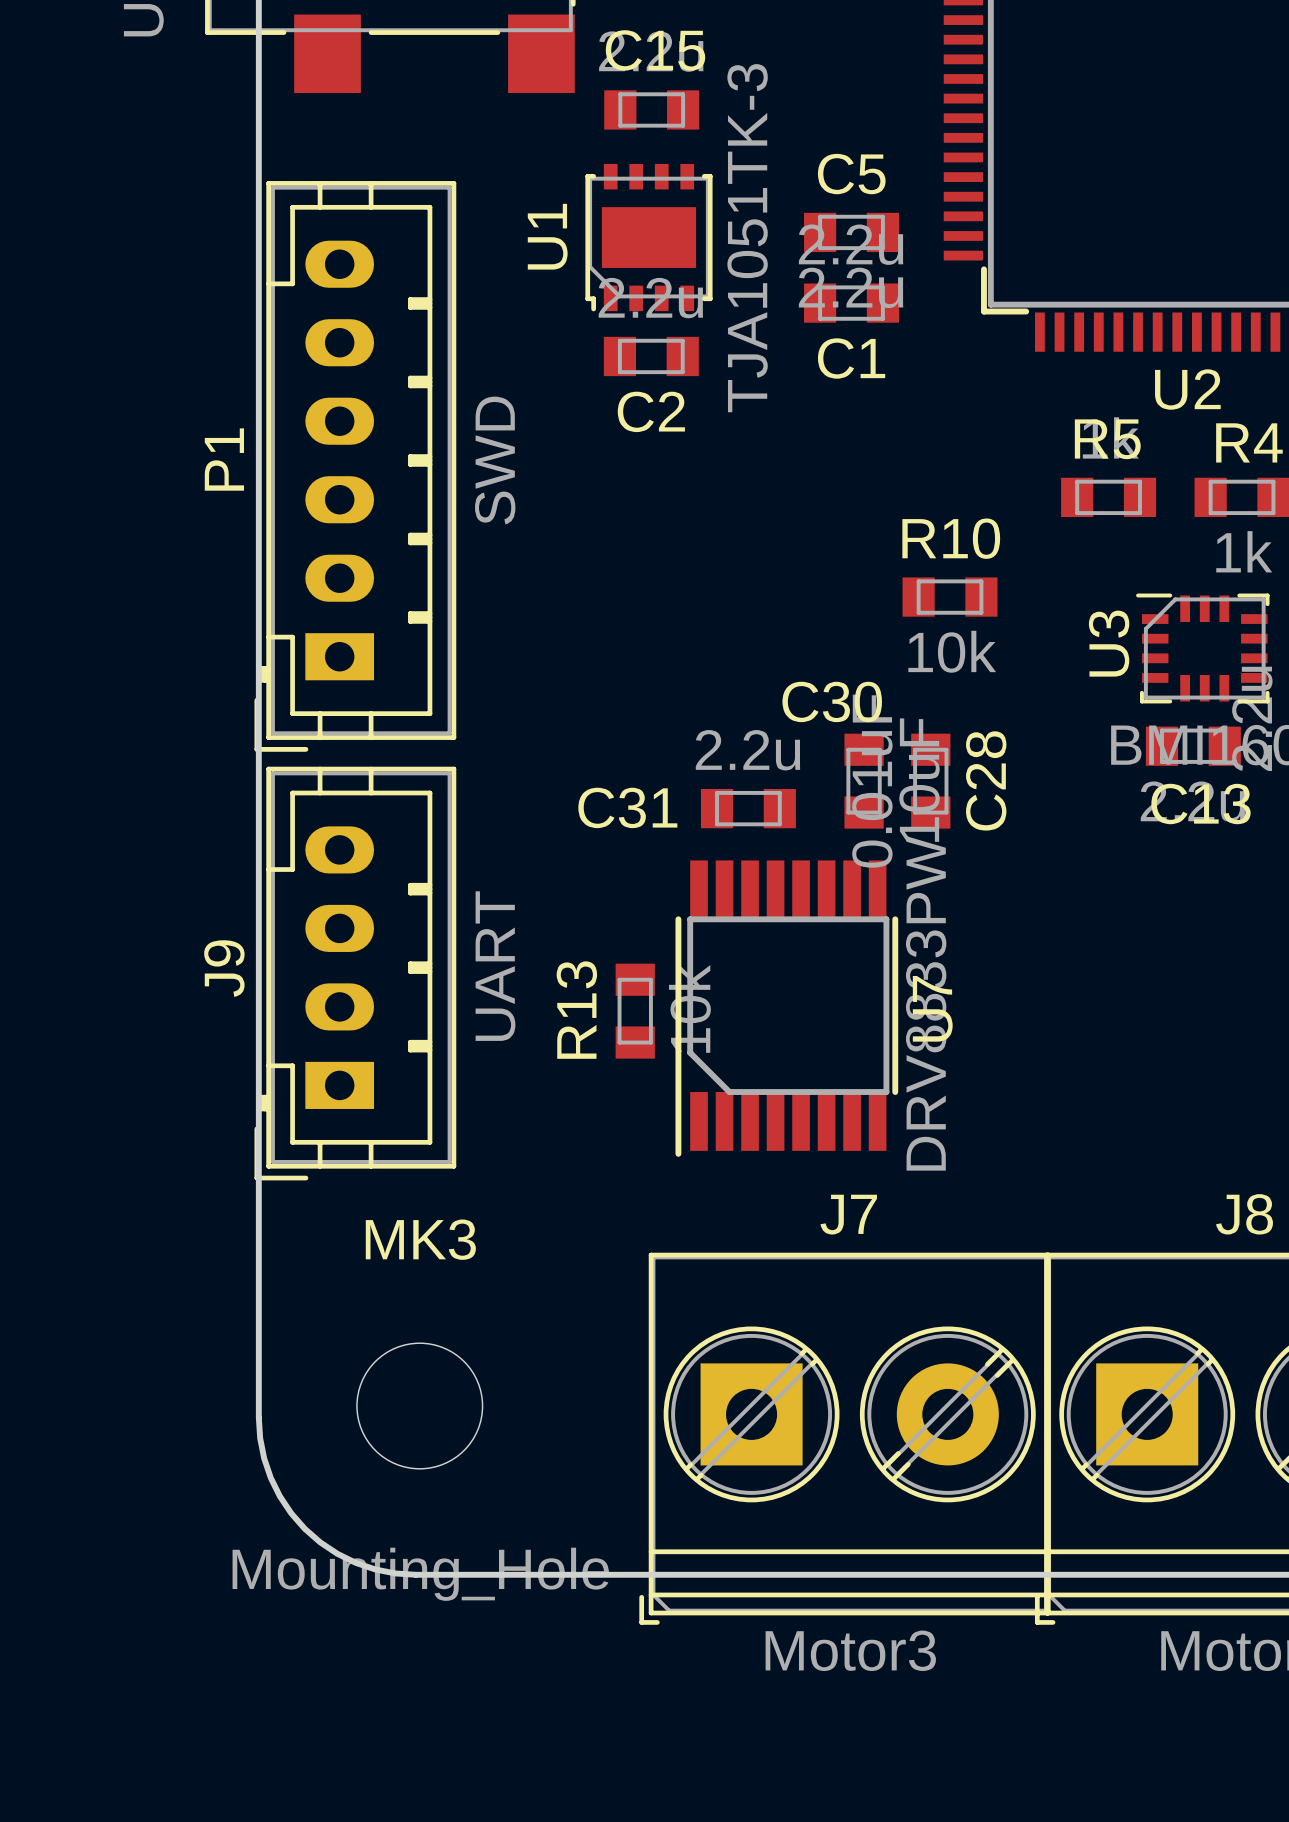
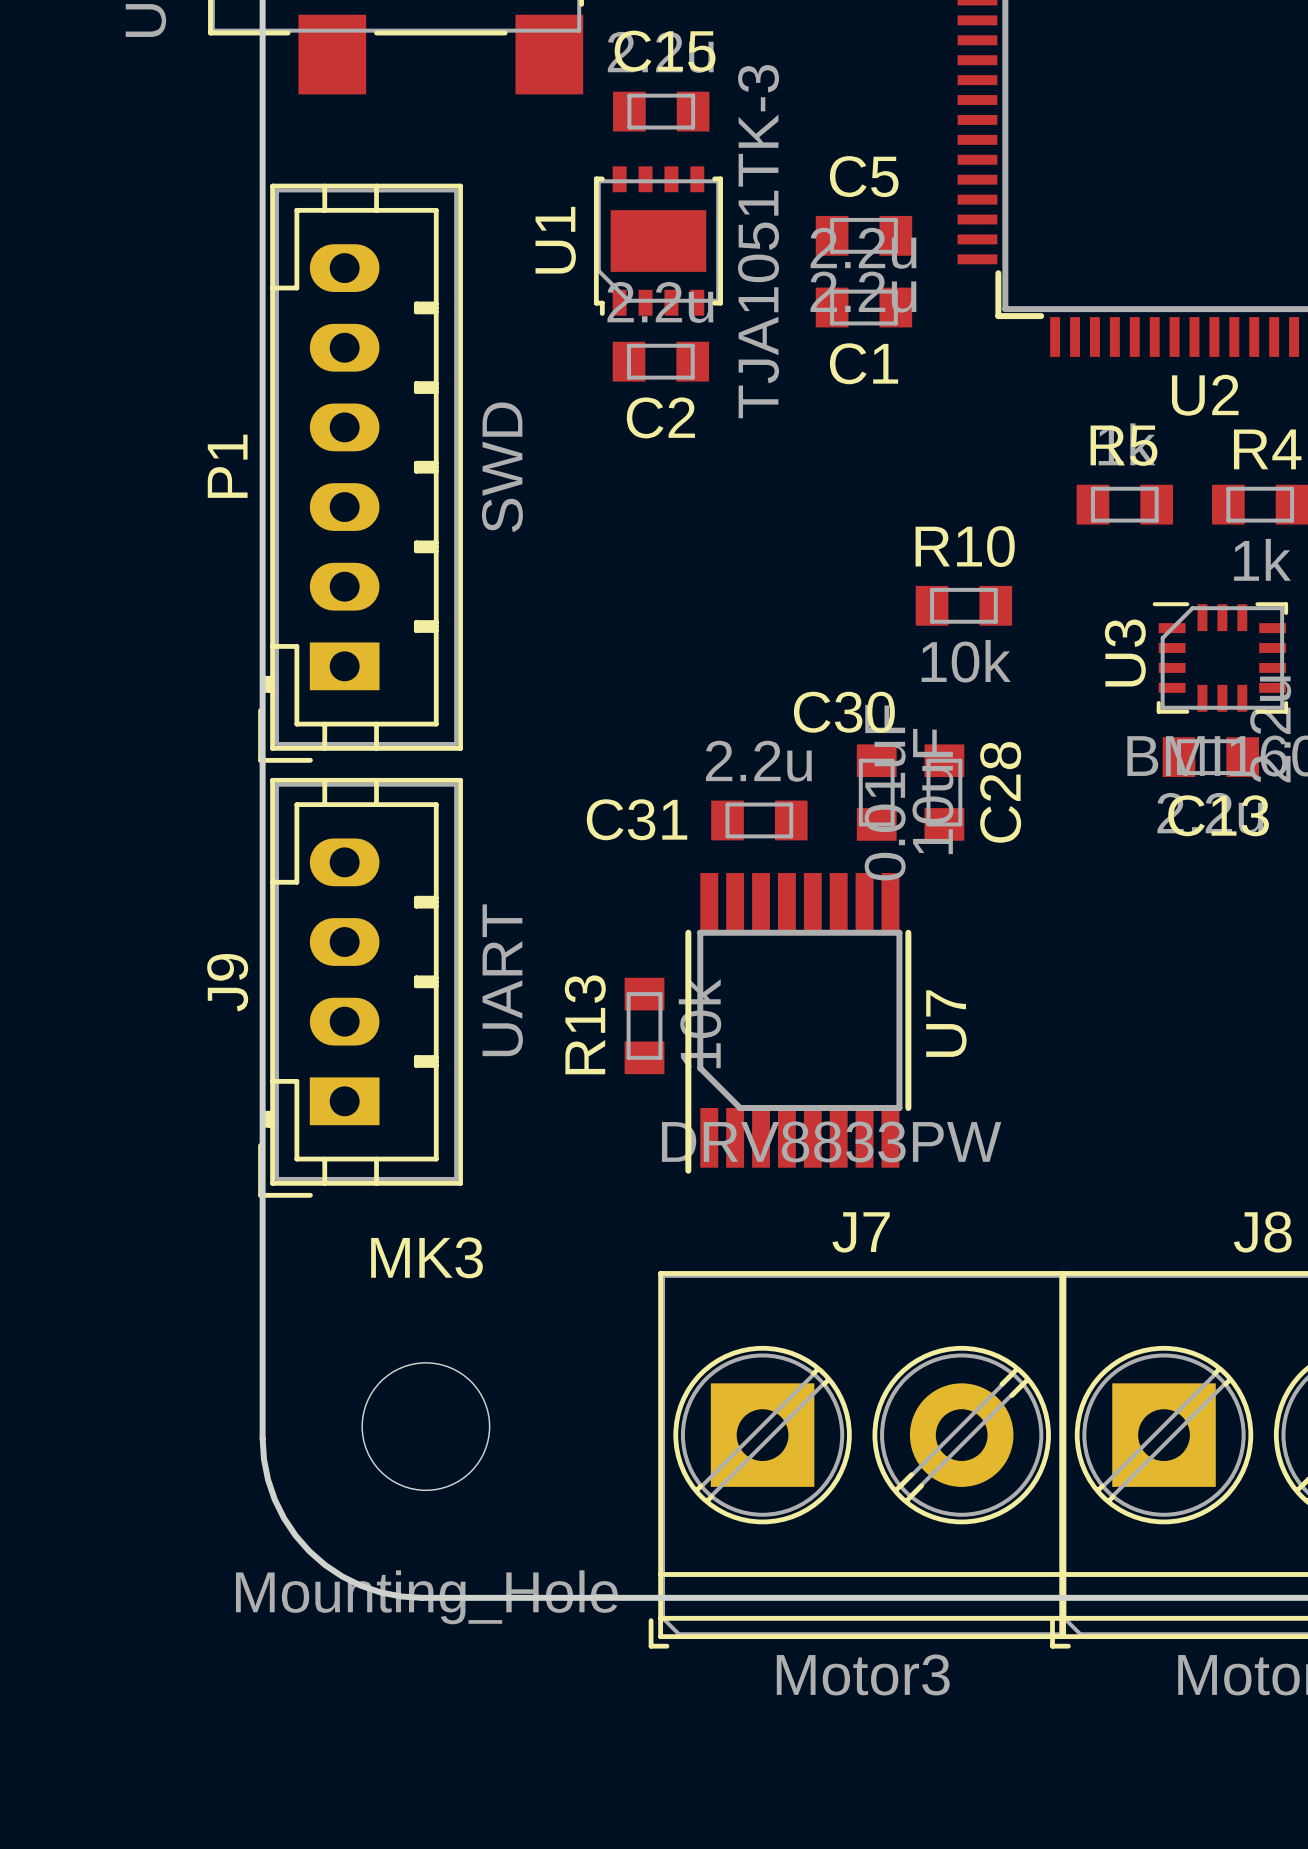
U7 value rotation: 0° (926, 1003) -> 90° clockwise (831, 1141)

